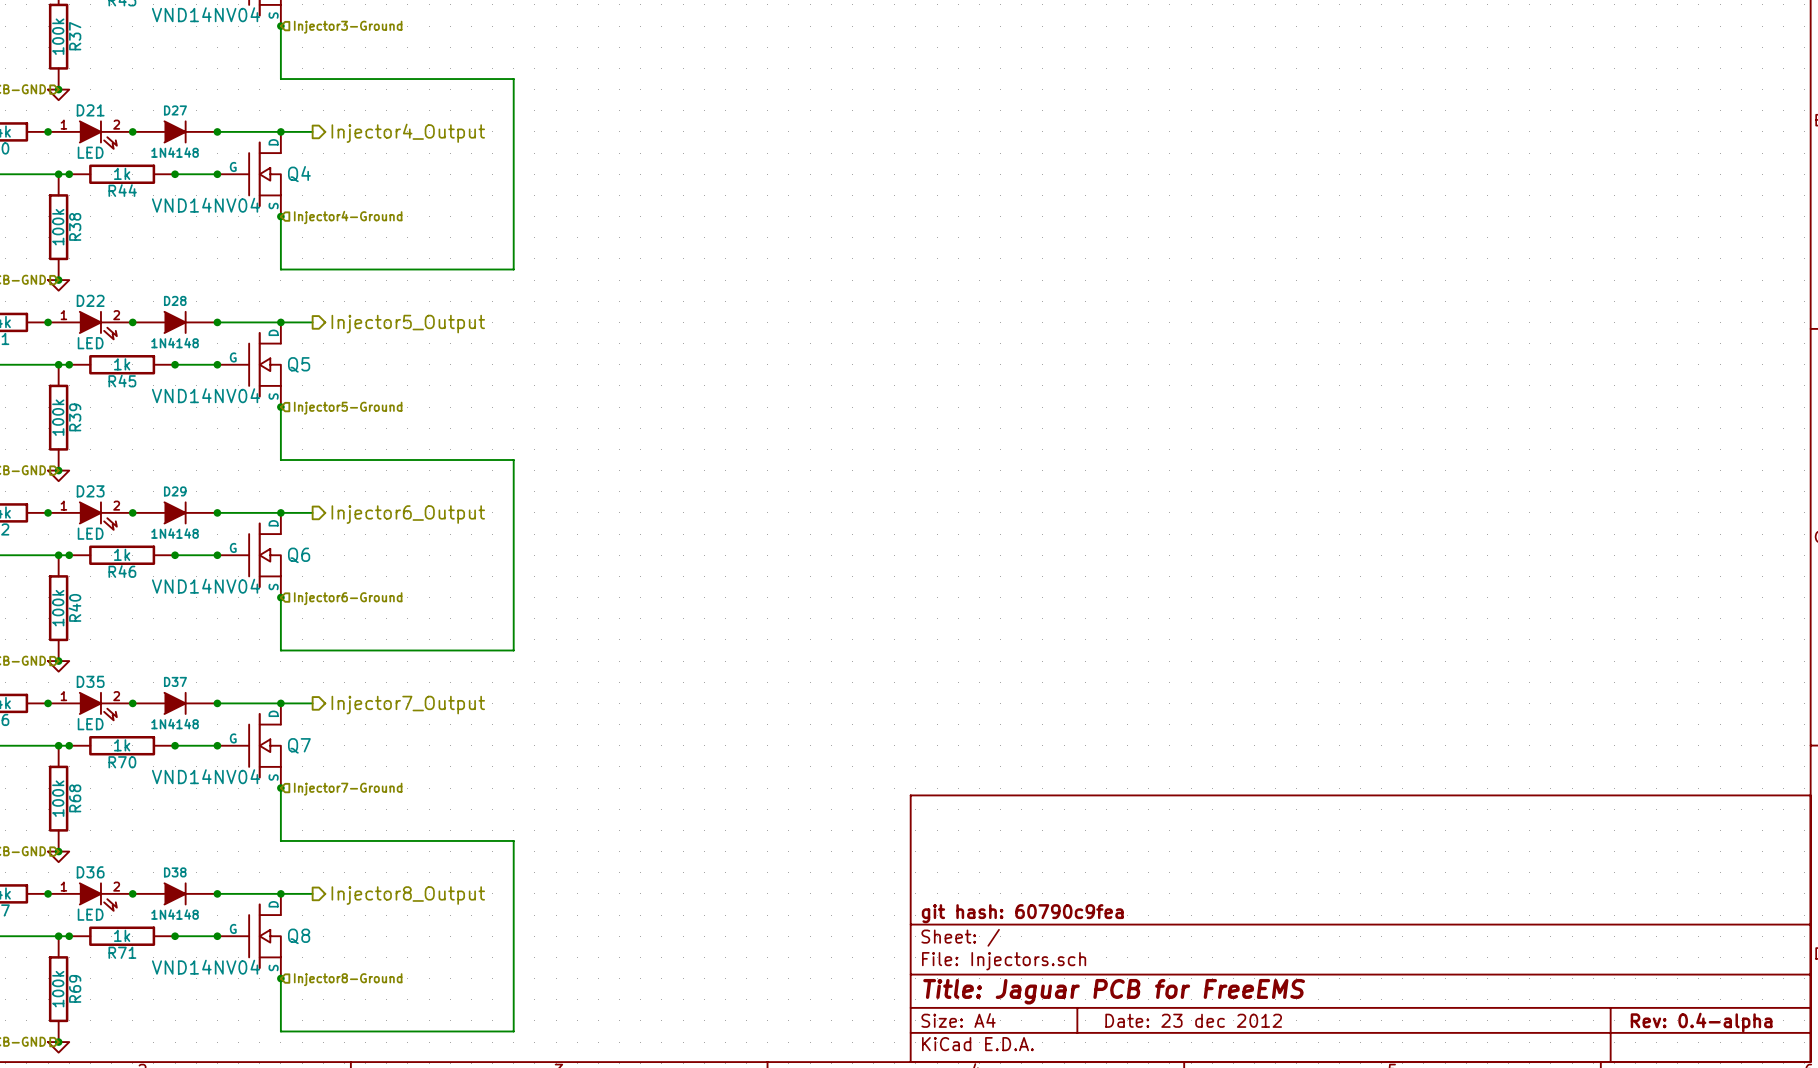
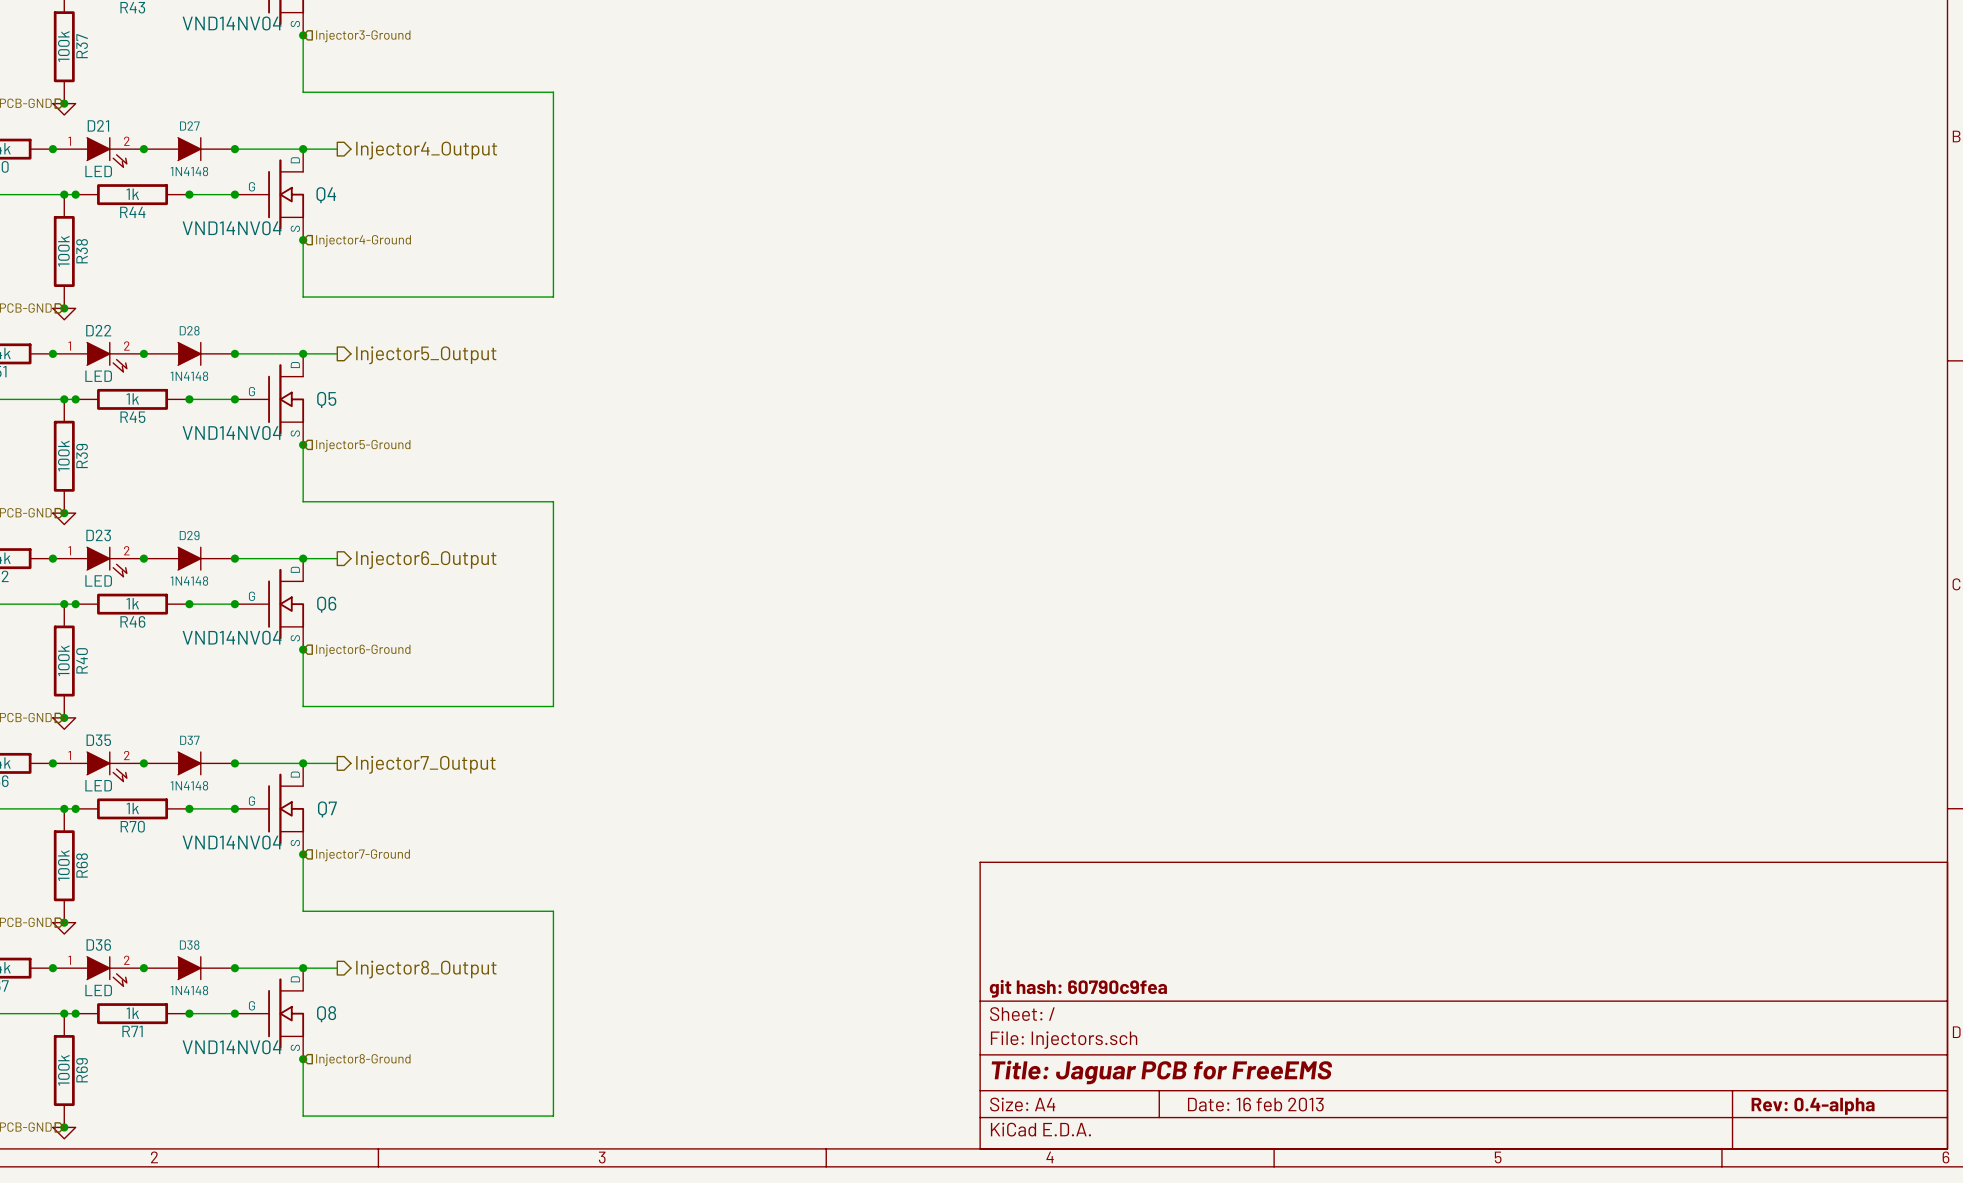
title block: Date: 23 dec 2012 (1193, 1020) -> Date: 16 feb 2013 (1255, 1104)

